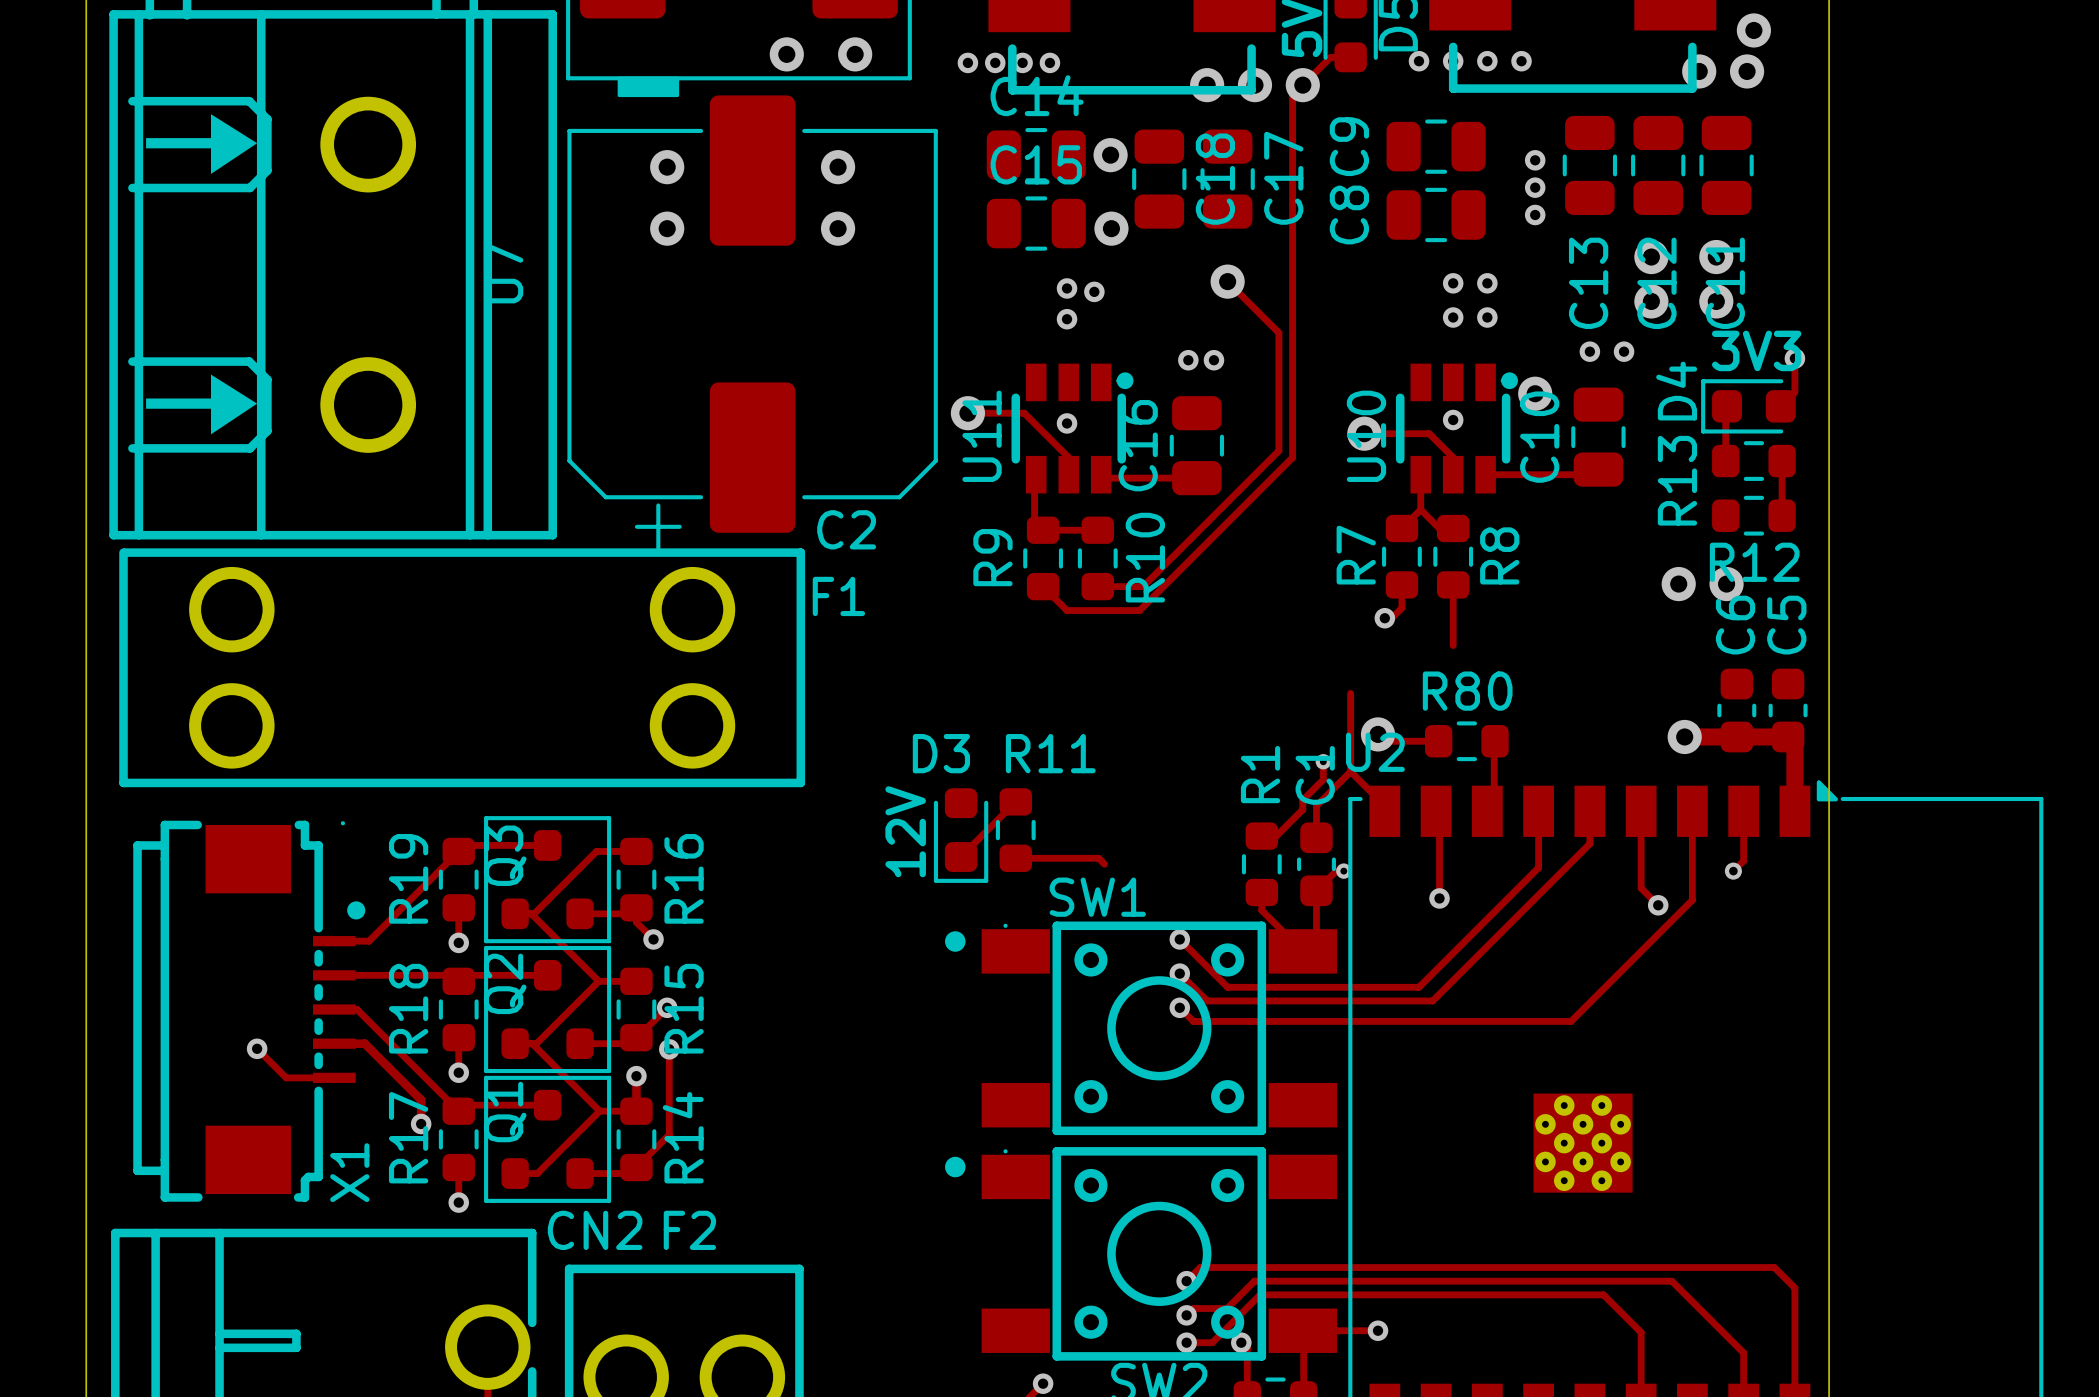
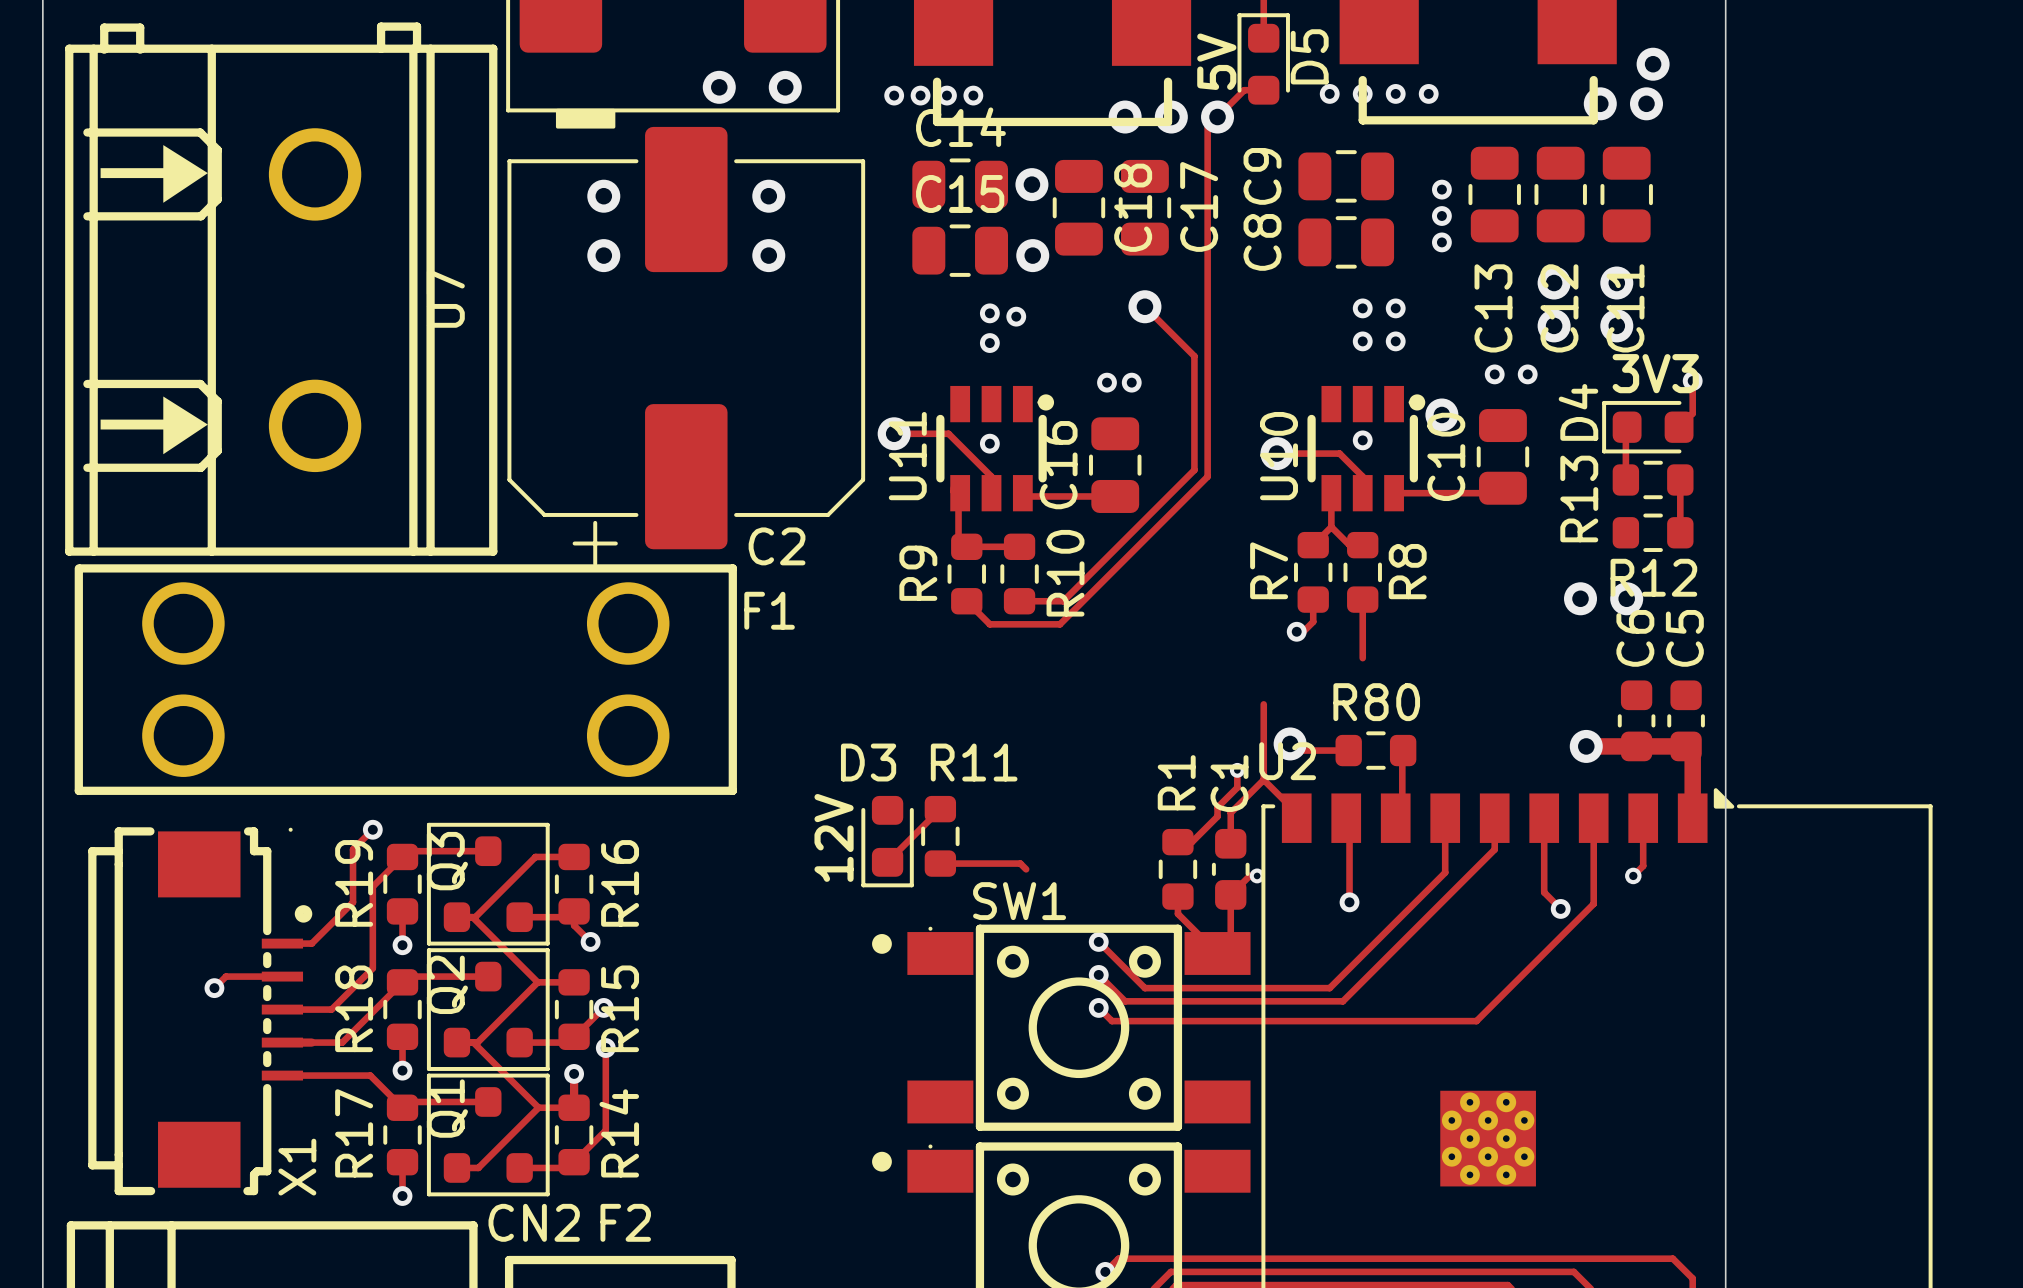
via: none -> (372, 829)
track: (427, 882) (369, 941) (364, 941) -> (372, 829) (353, 849) (353, 902) (311, 943)
track: none -> (372, 886) (372, 968) (331, 1009) (304, 1009)
track: (334, 975) (452, 975) (458, 981) -> (311, 1042) (342, 1042) (402, 982)
track: none -> (282, 976) (225, 976) (214, 988)
track: (357, 1009) (425, 1077) -> (282, 1075) (370, 1075)
track: (364, 1043) (421, 1100) (421, 1123) -> none
track: (257, 1048) (286, 1077) (334, 1077) -> none
via position: (257, 1048) -> (214, 988)
via: (421, 1123) -> none

